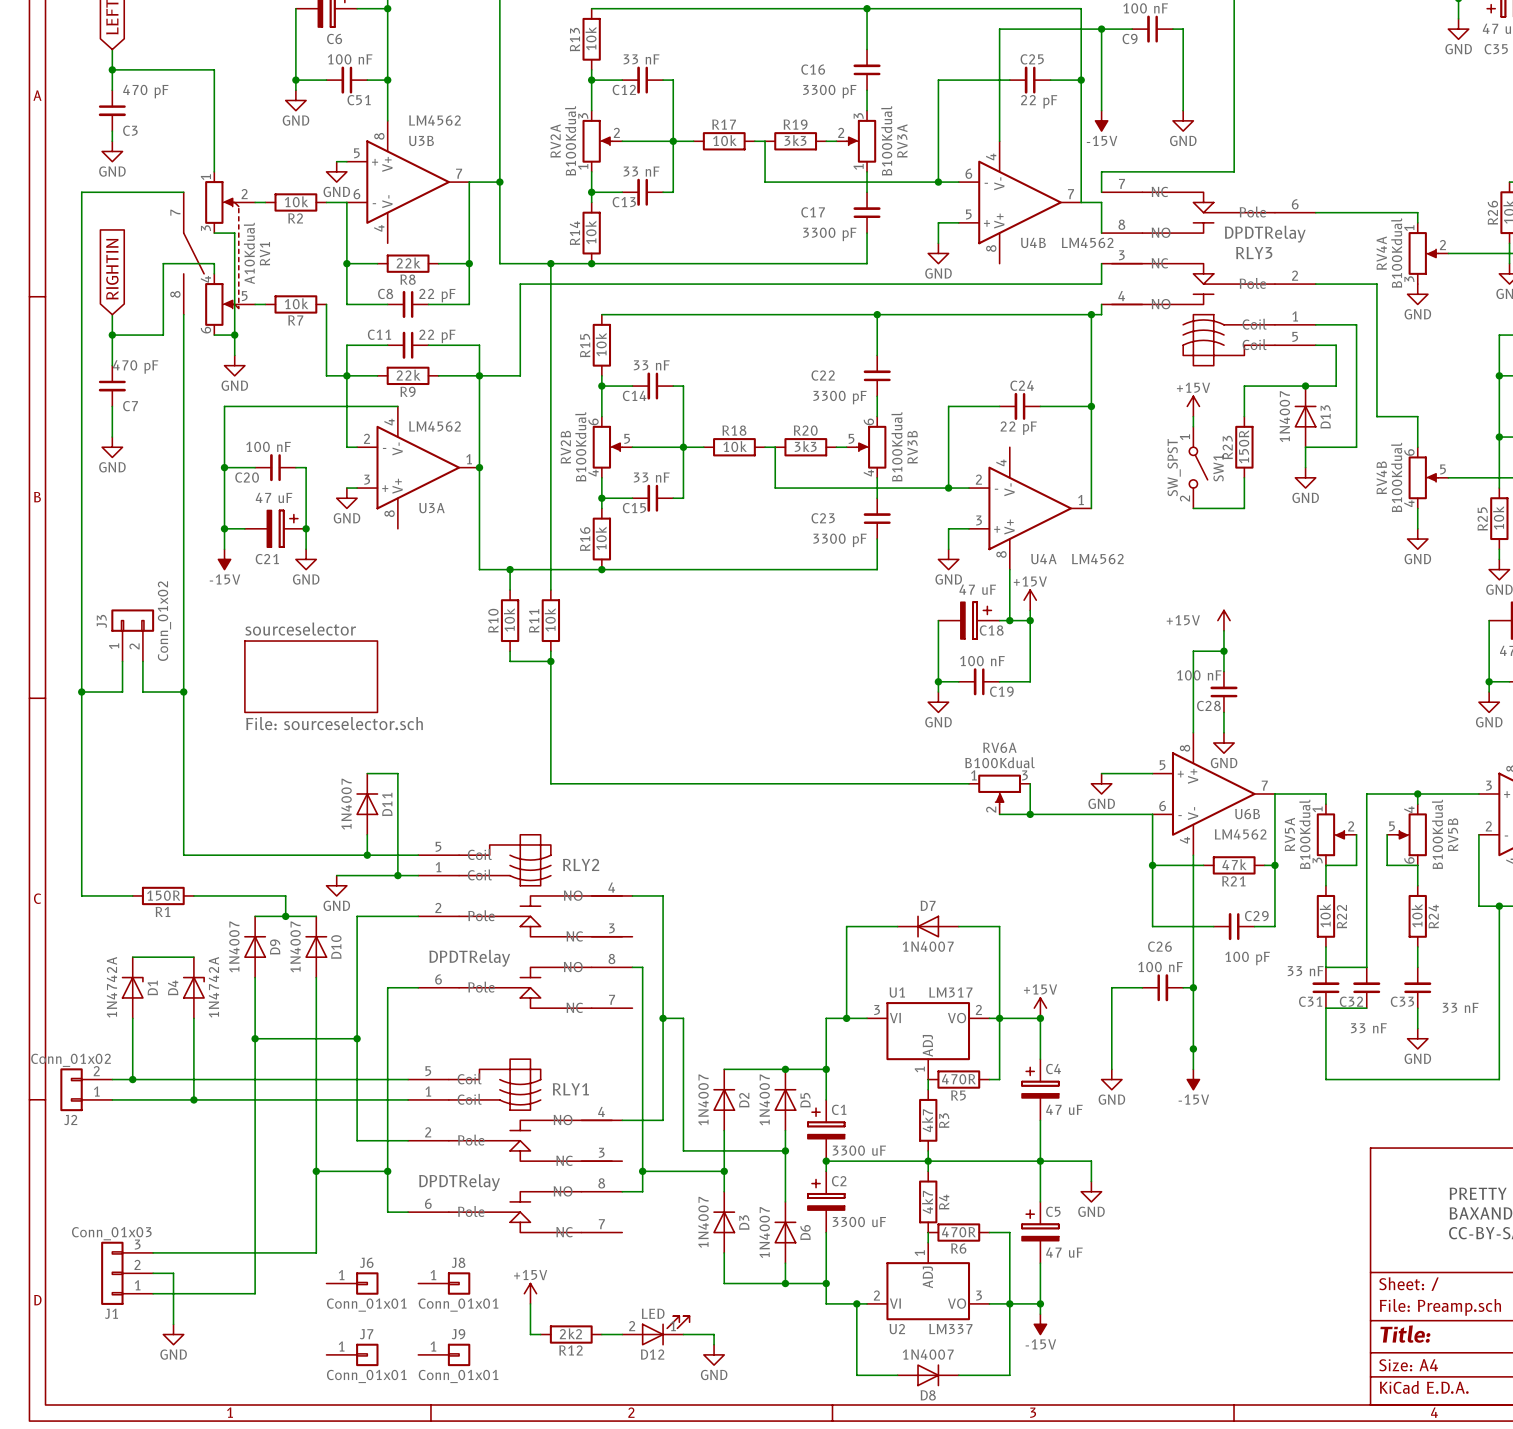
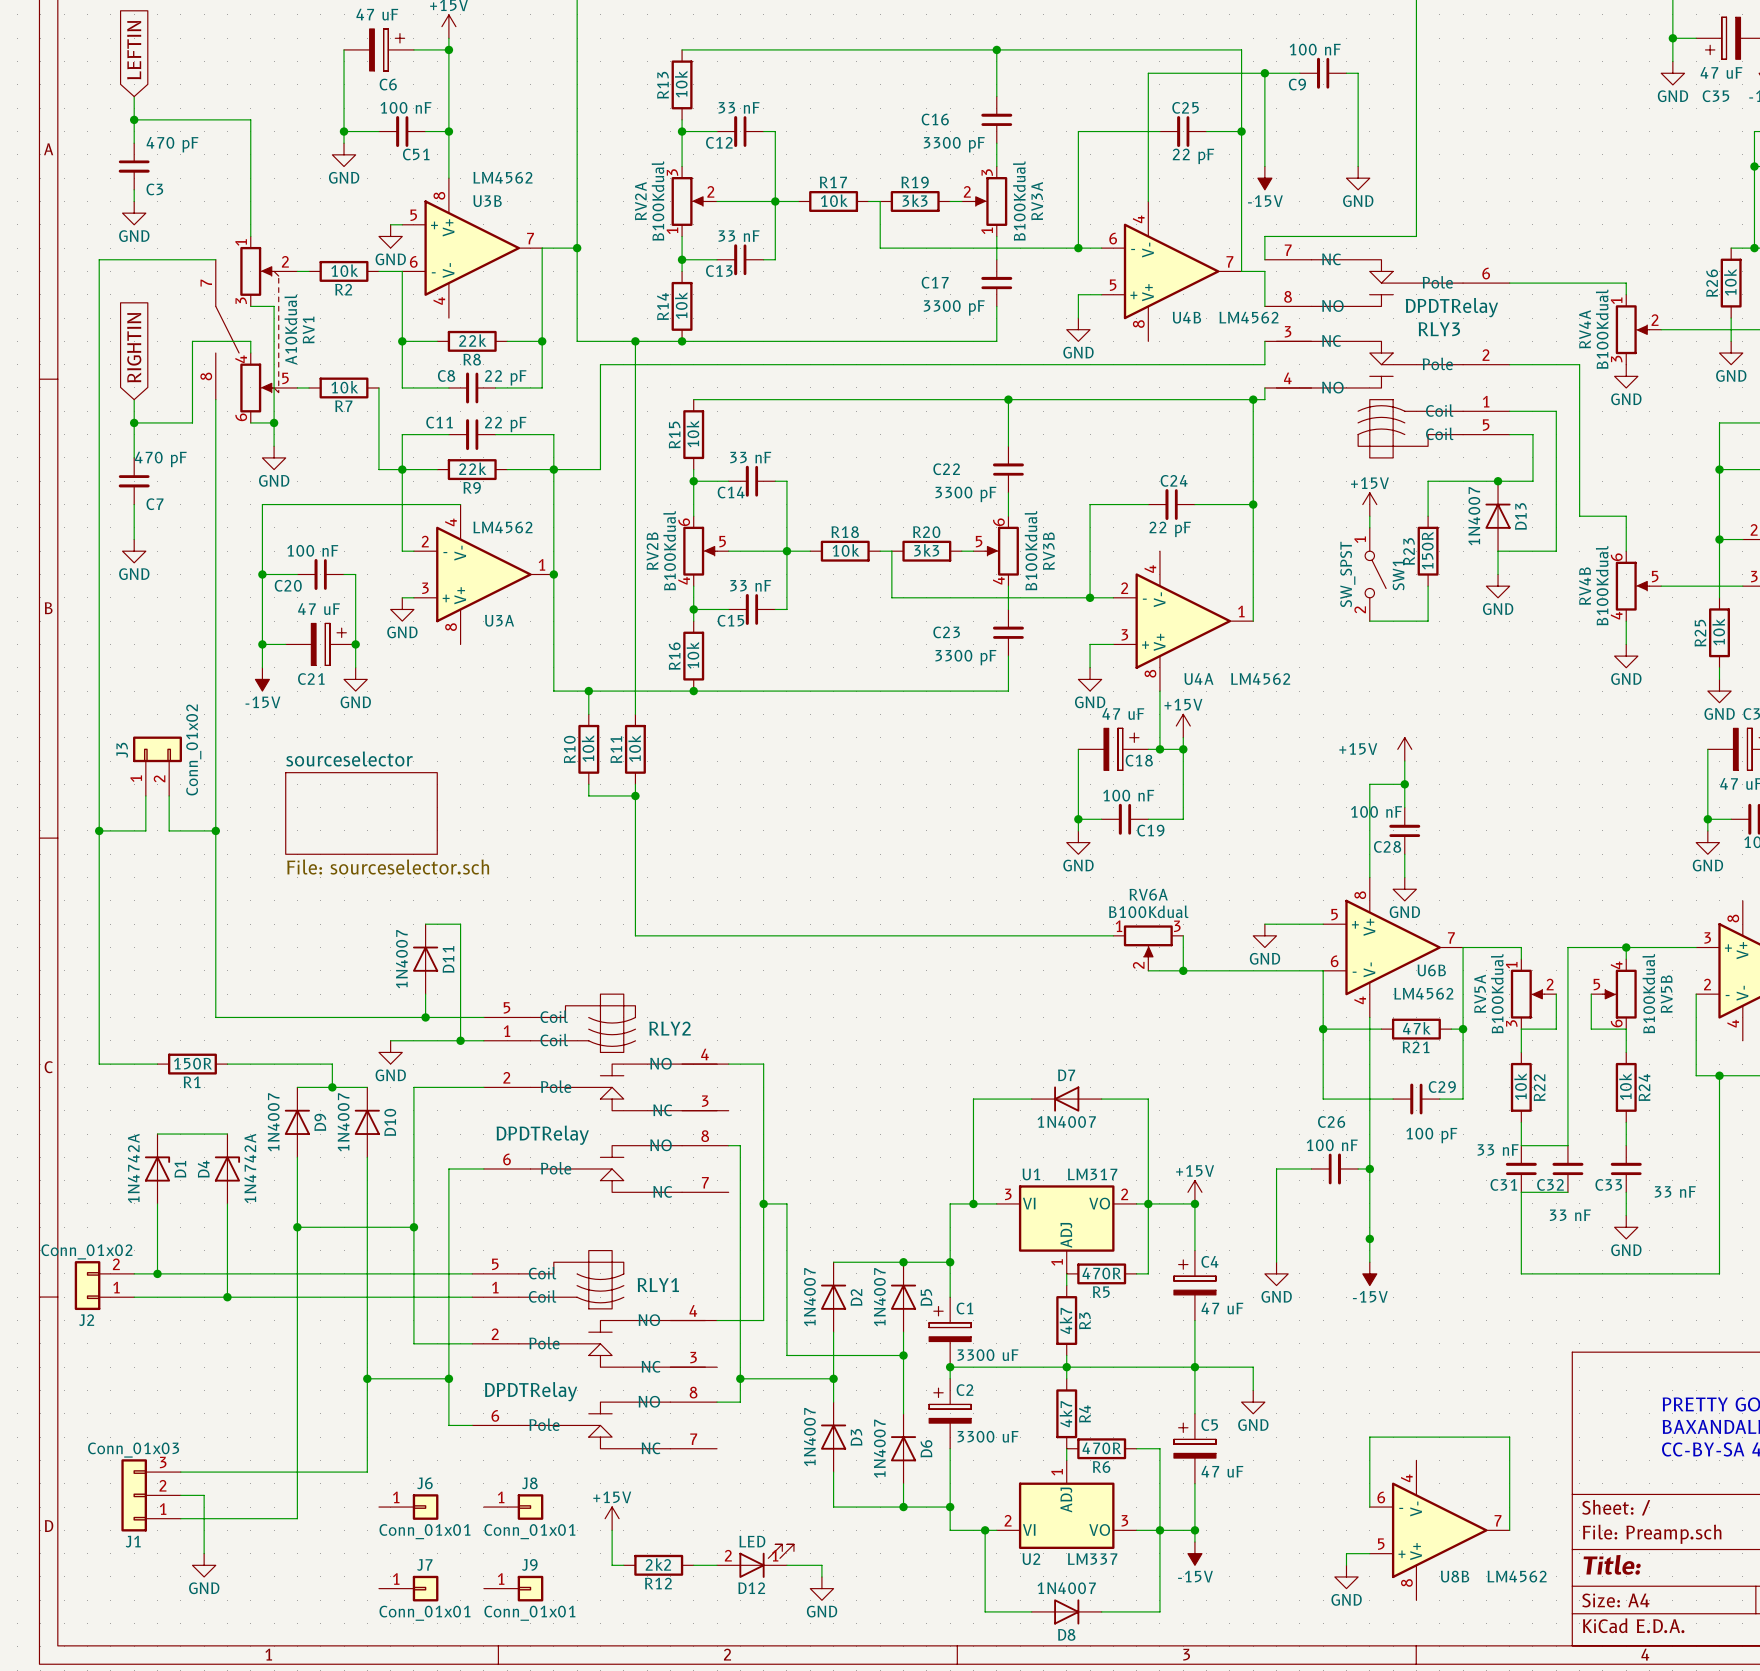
wire: none -> (1369, 1507) (1369, 1437) (1509, 1437) (1509, 1530)
U8B: none -> LM4562 (1439, 1530)
wire: none -> (1369, 1553) (1346, 1553) (1346, 1565)
power symbol: none -> GND (1346, 1576)

